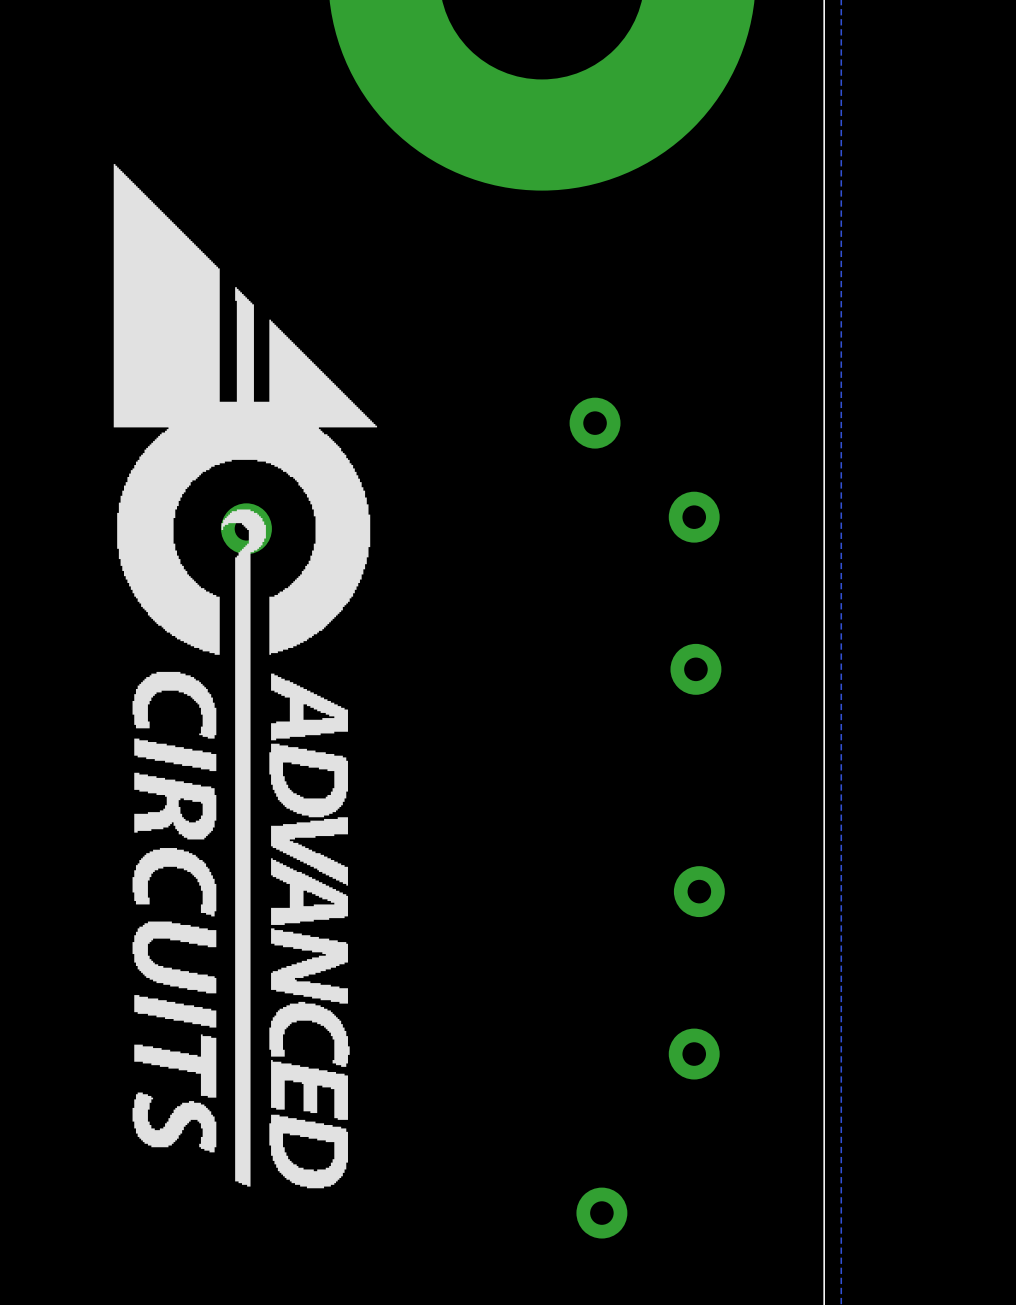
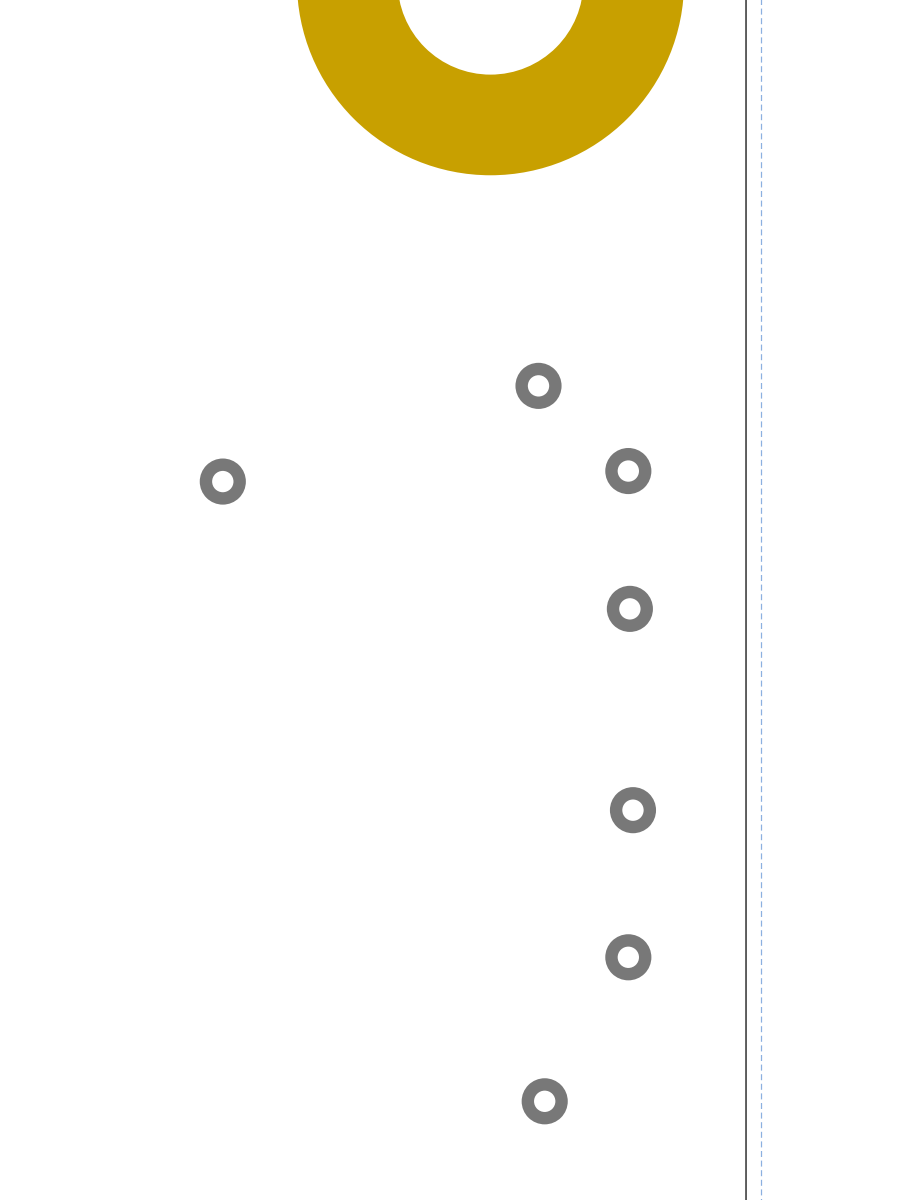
drawing: [113, 164, 378, 1189] -> none

